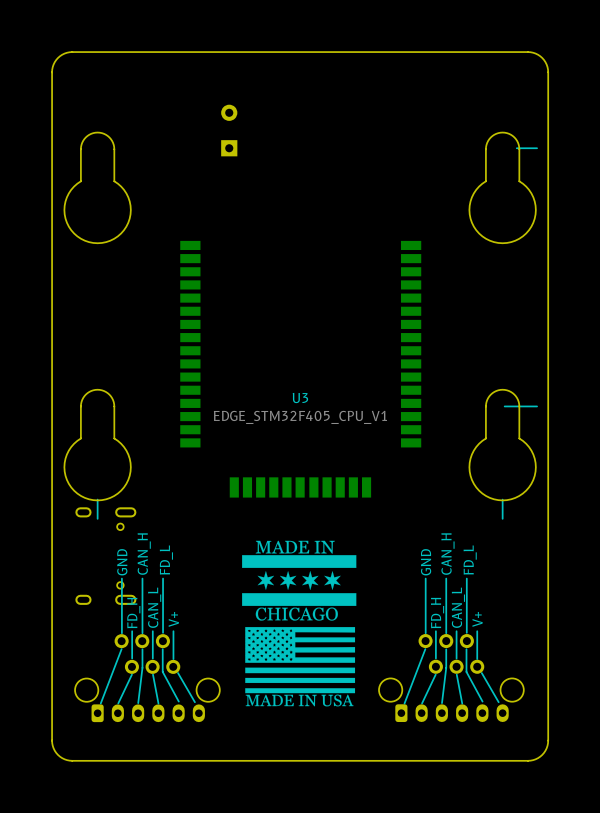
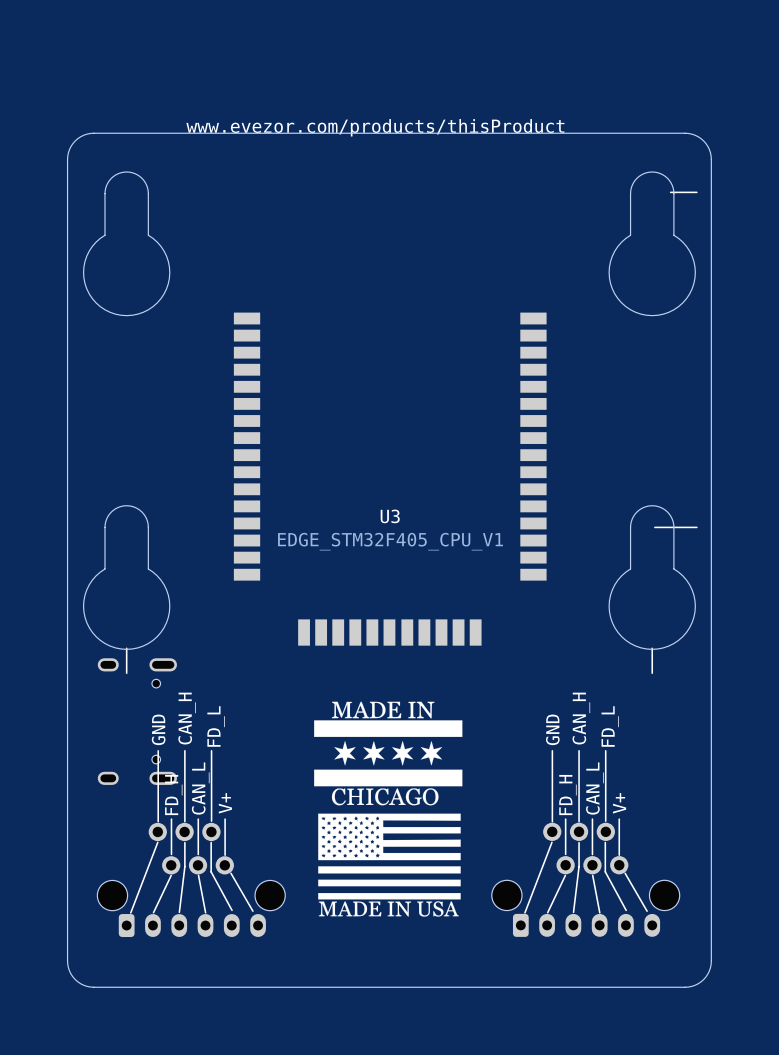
text: none -> www.evezor.com/products/thisProduct (375, 127)
board edge: (548, 122) (547, 67) (540, 56) (527, 52) (69, 52) (57, 57) (52, 67) (52, 122) -> (711, 159) (709, 149) (703, 140) (695, 135) (685, 133) (93, 133) (83, 135) (75, 140) (69, 149) (67, 159)
part: (229, 130) -> none

